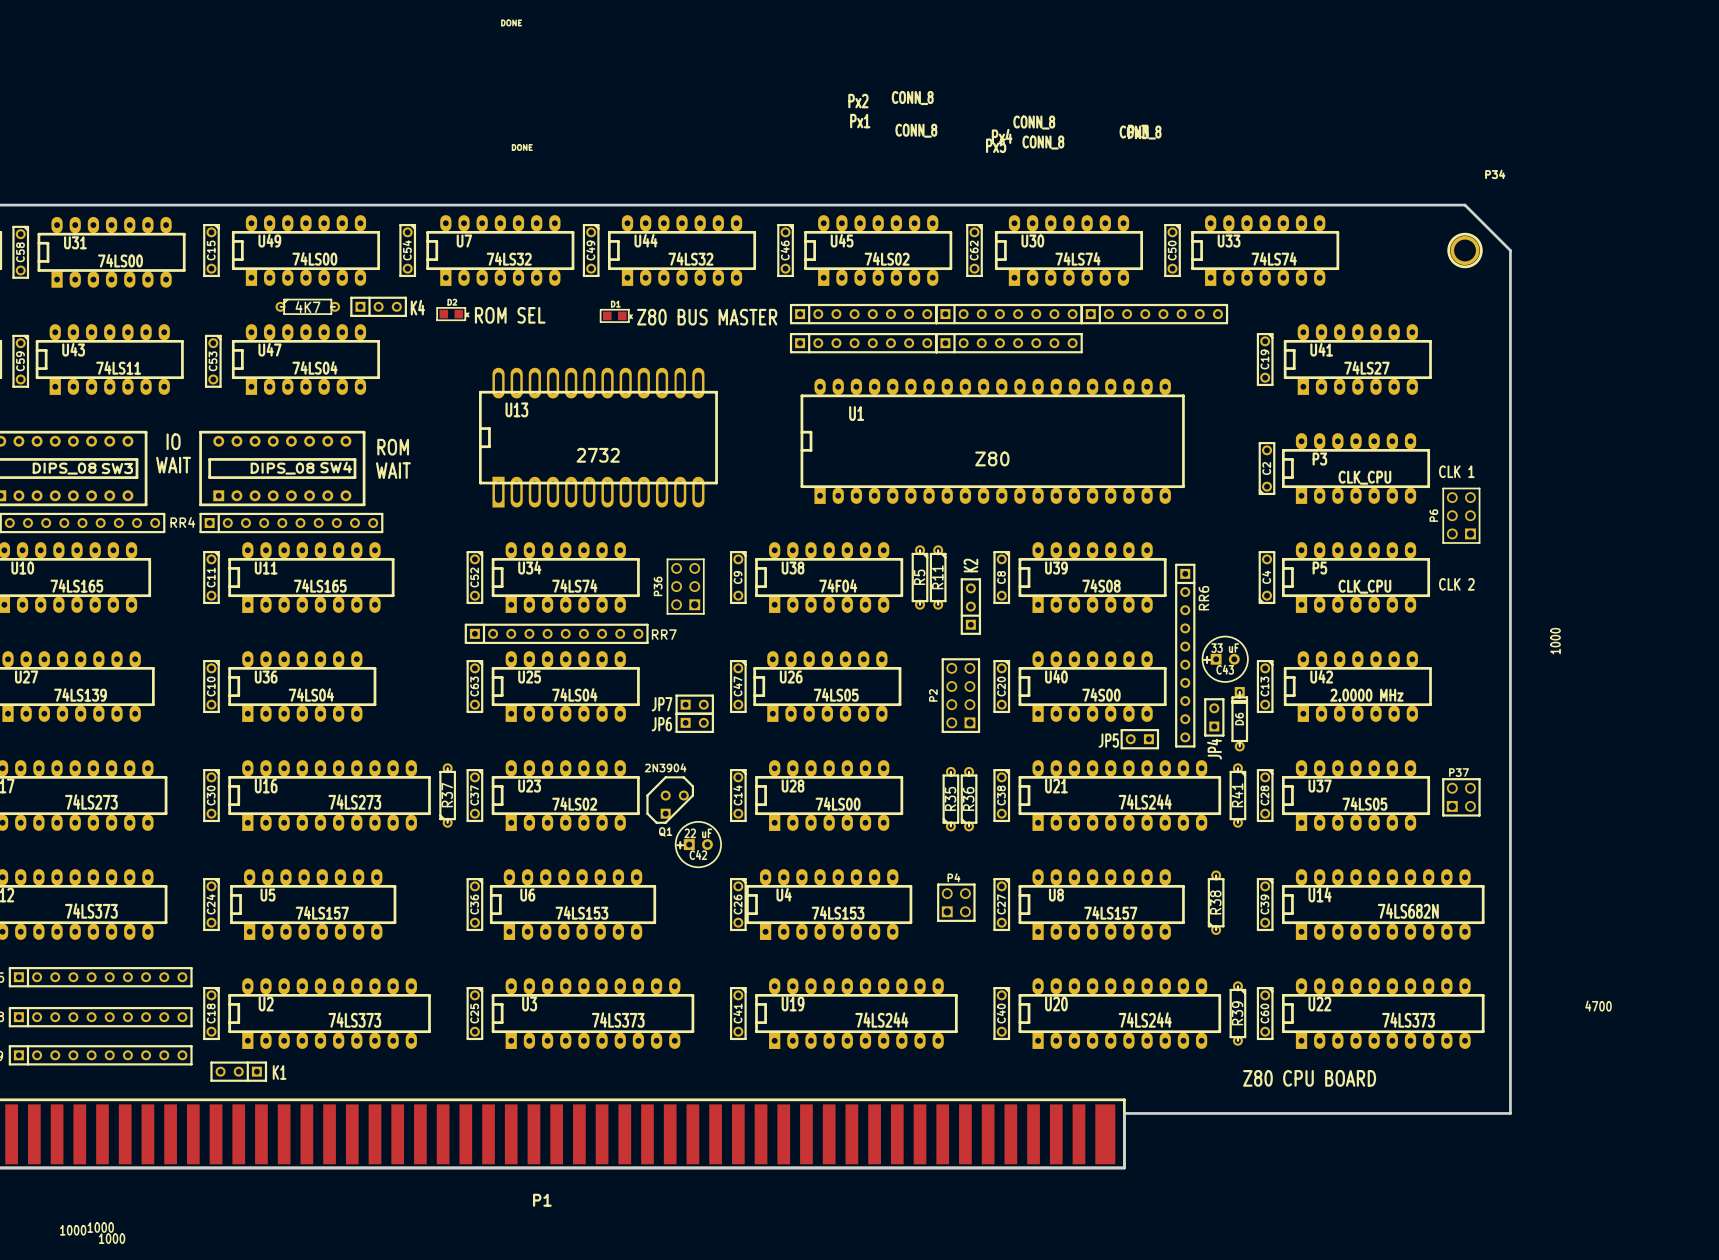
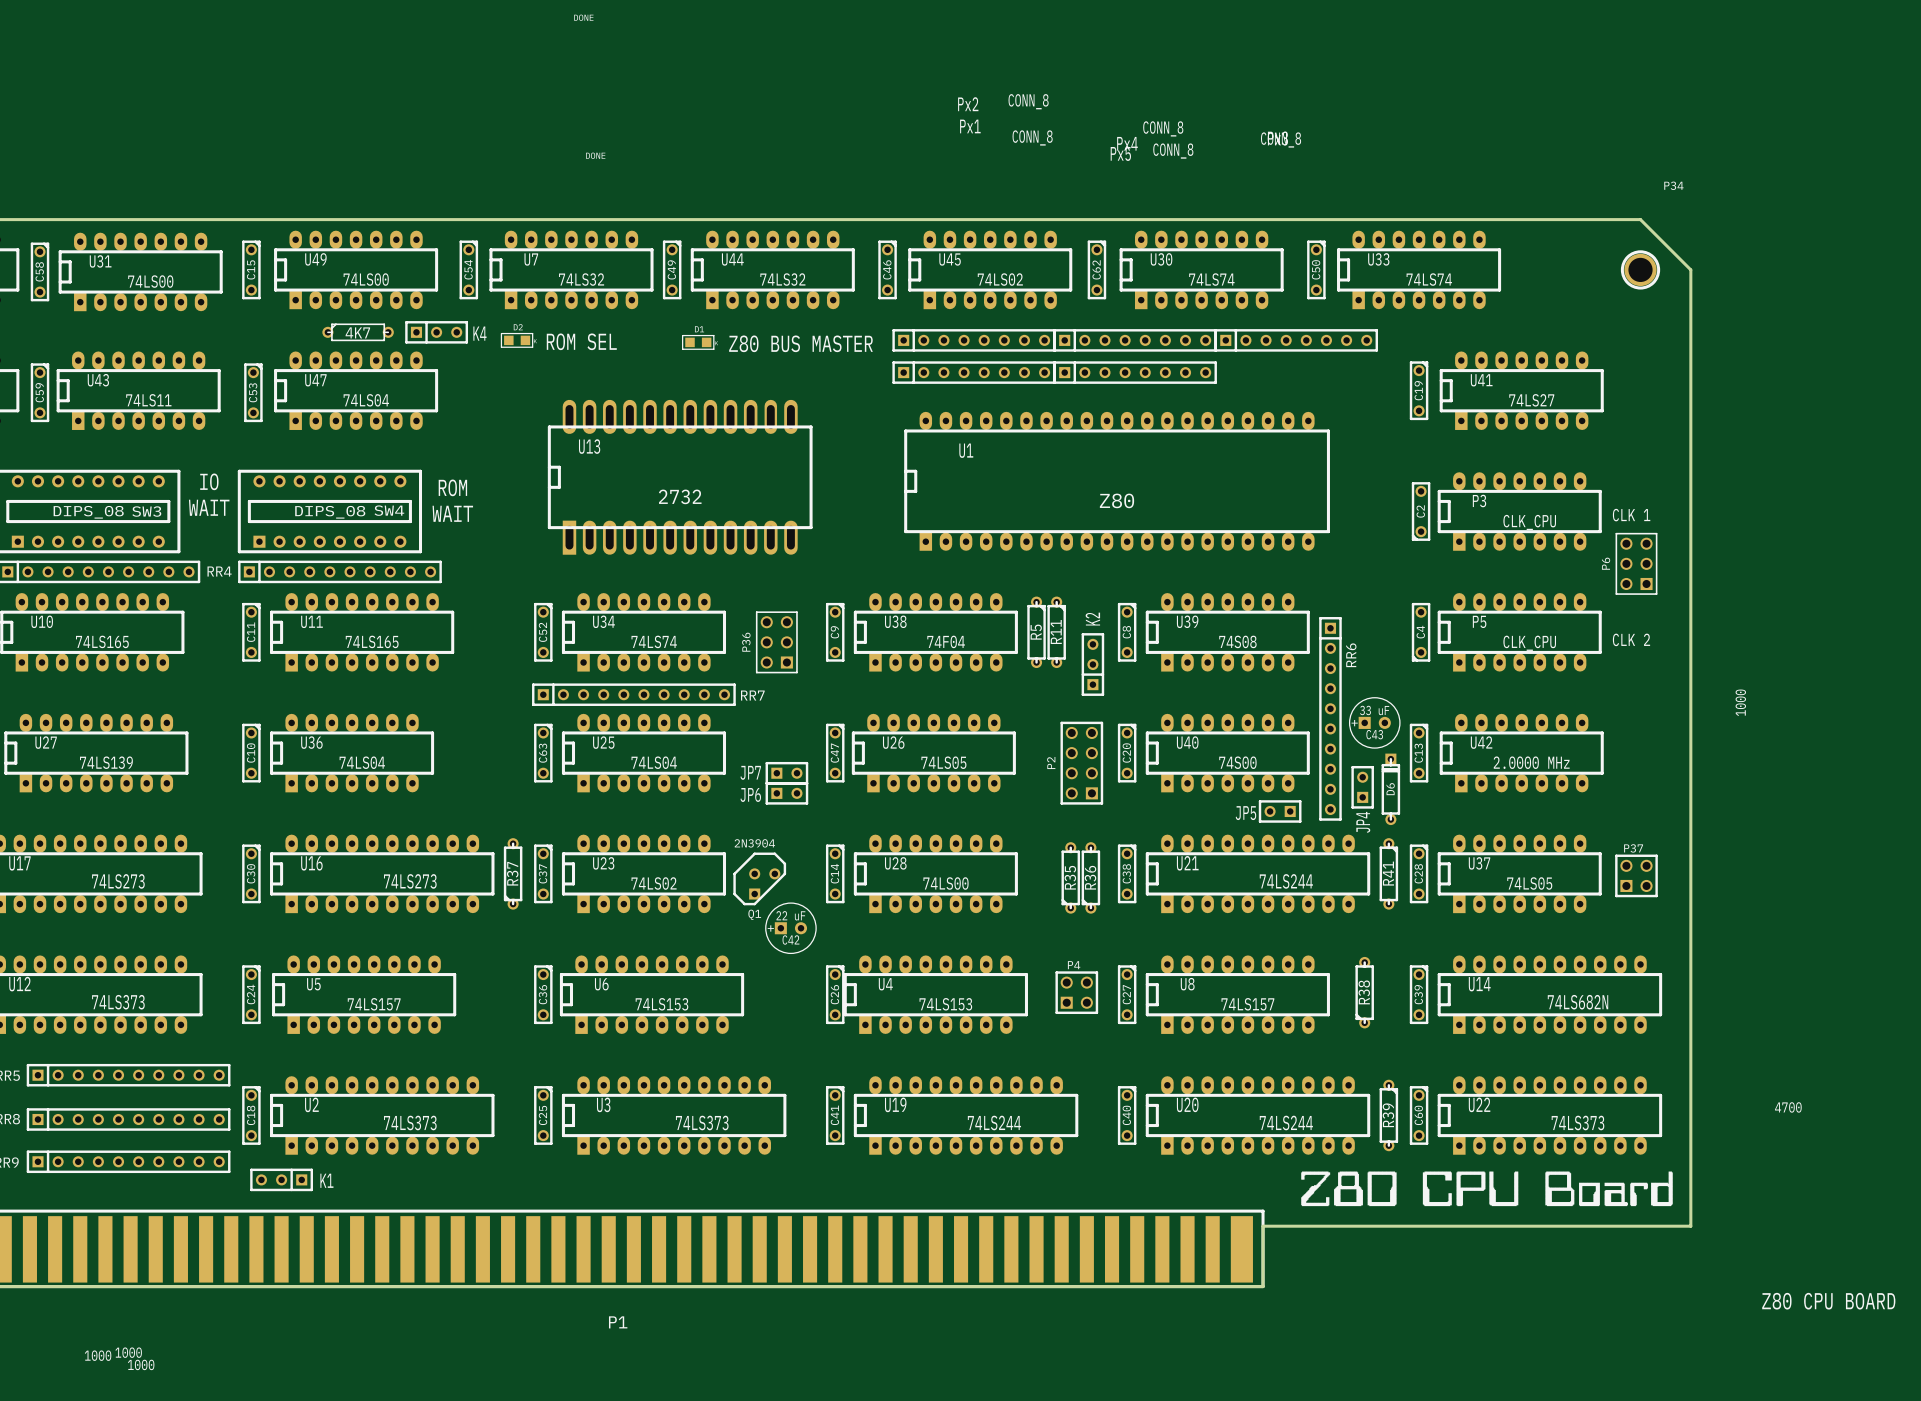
drawing: none -> [1301, 1171, 1673, 1207]
text: Z80 CPU BOARD (1309, 1078) -> none
text: none -> Z80 CPU BOARD (1828, 1301)

